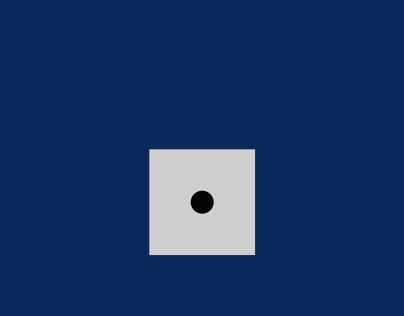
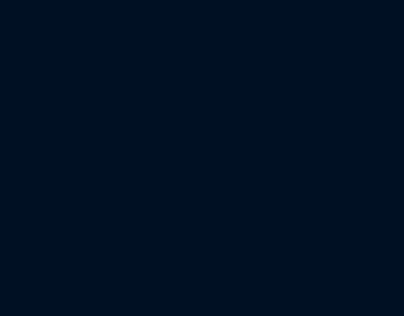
part: (202, 202) -> none

